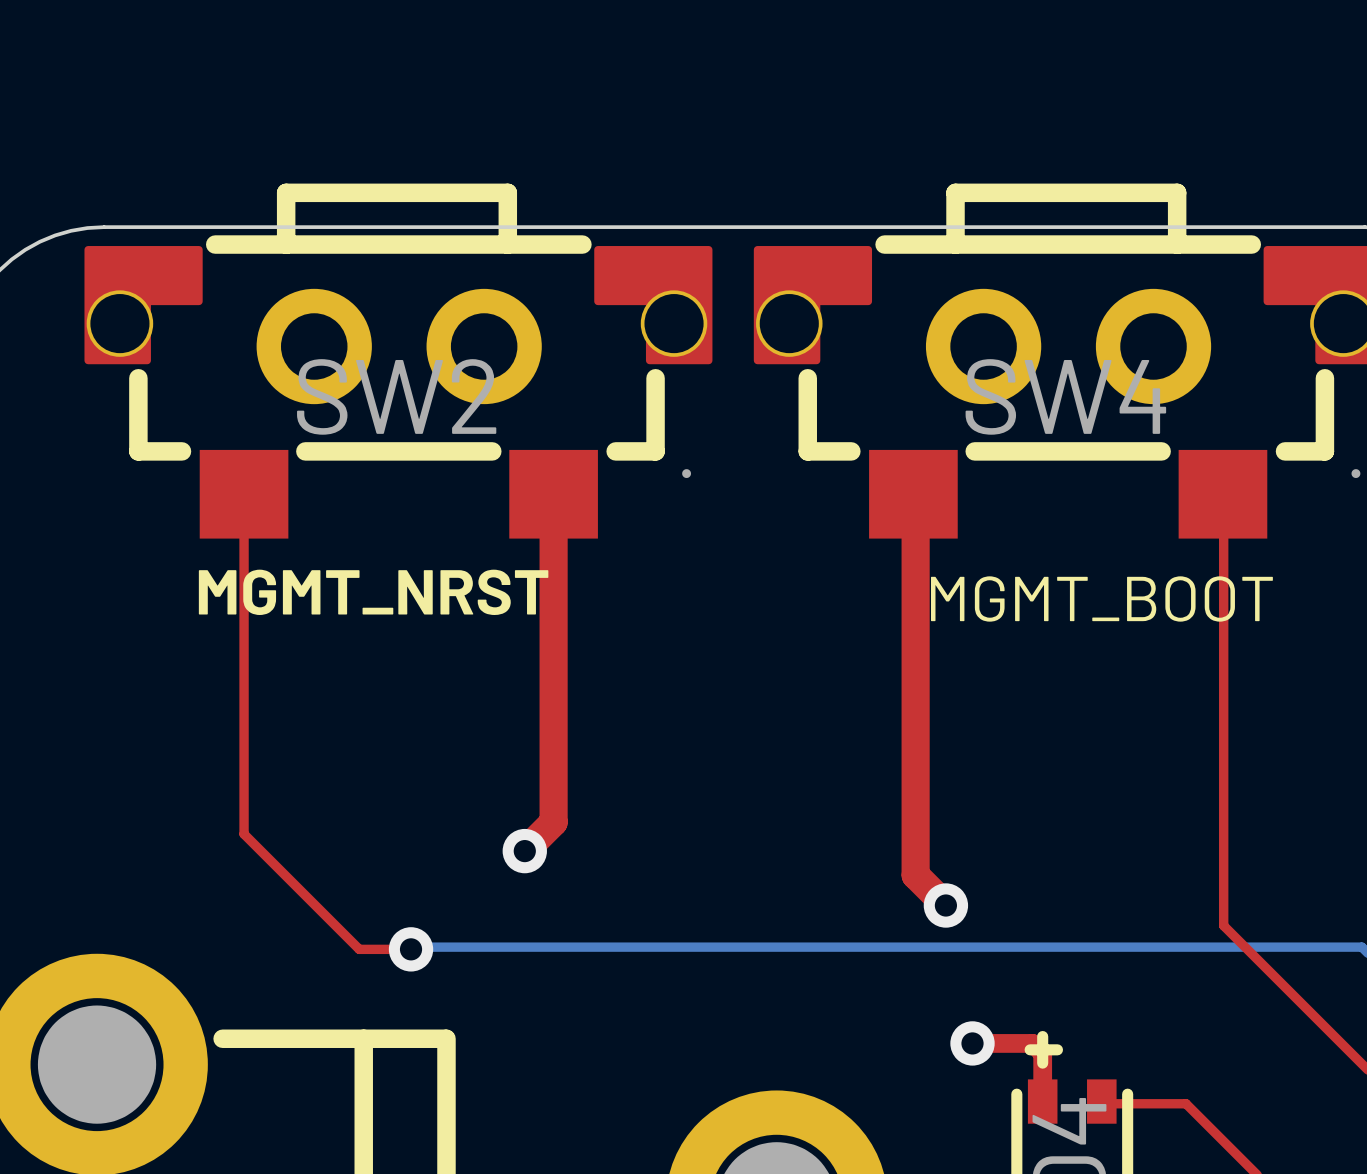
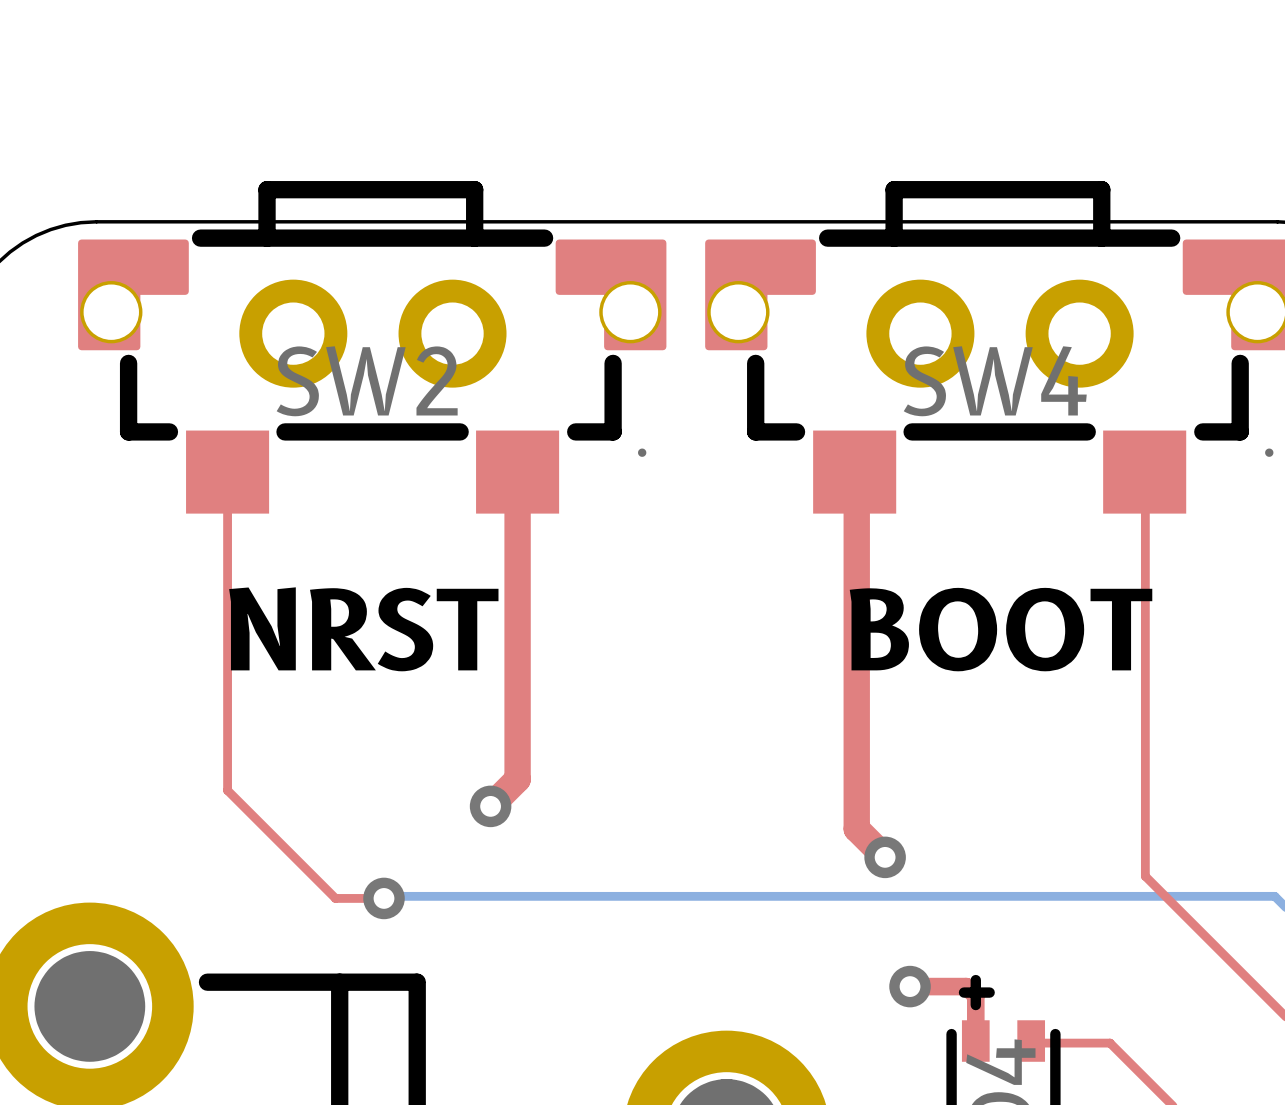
text: MGMT_NRST (373, 592) -> NRST (363, 629)
text: MGMT_BOOT (1101, 598) -> BOOT (1001, 629)

